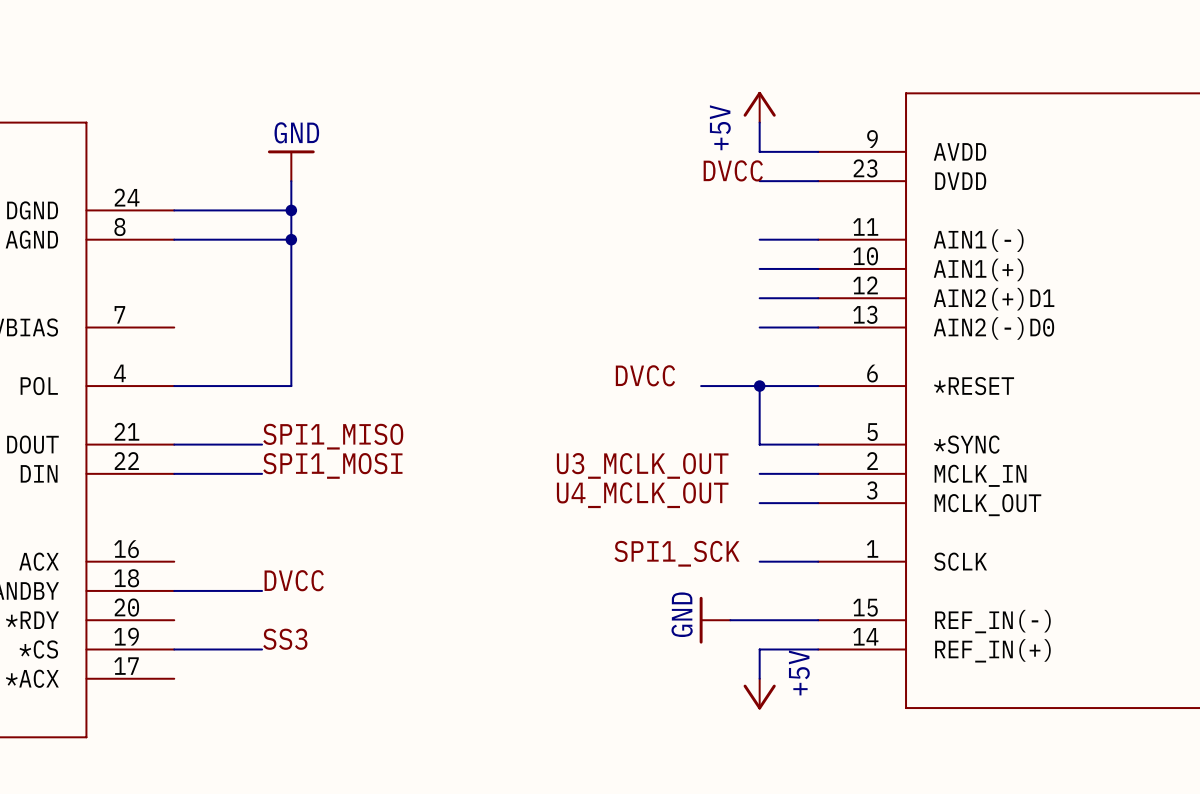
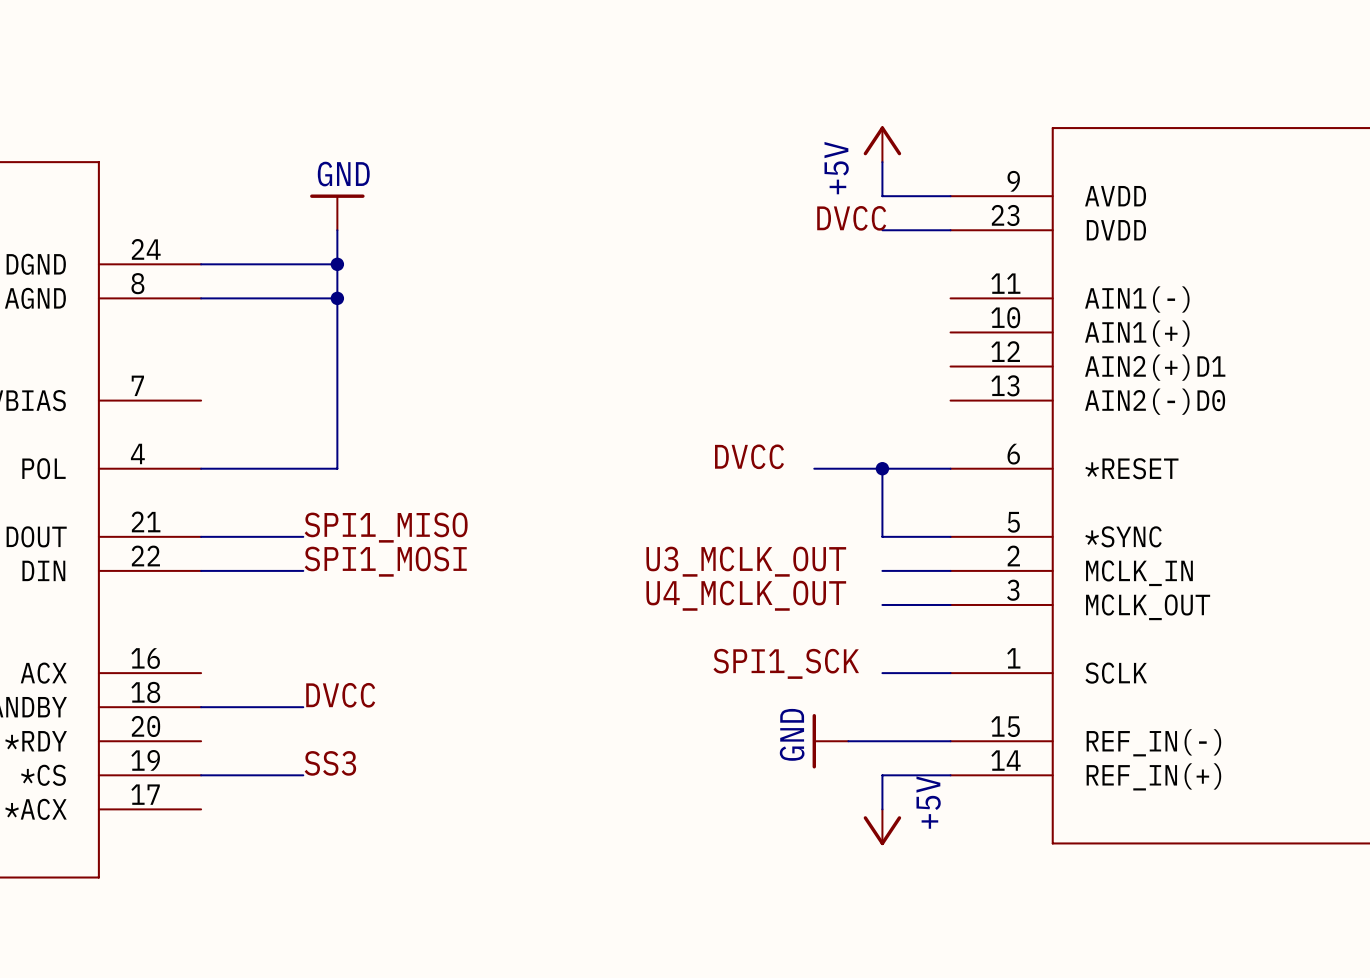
wire: (759, 239) (818, 239) -> none
wire: (759, 268) (818, 268) -> none
wire: (759, 298) (818, 298) -> none
wire: (759, 327) (818, 327) -> none

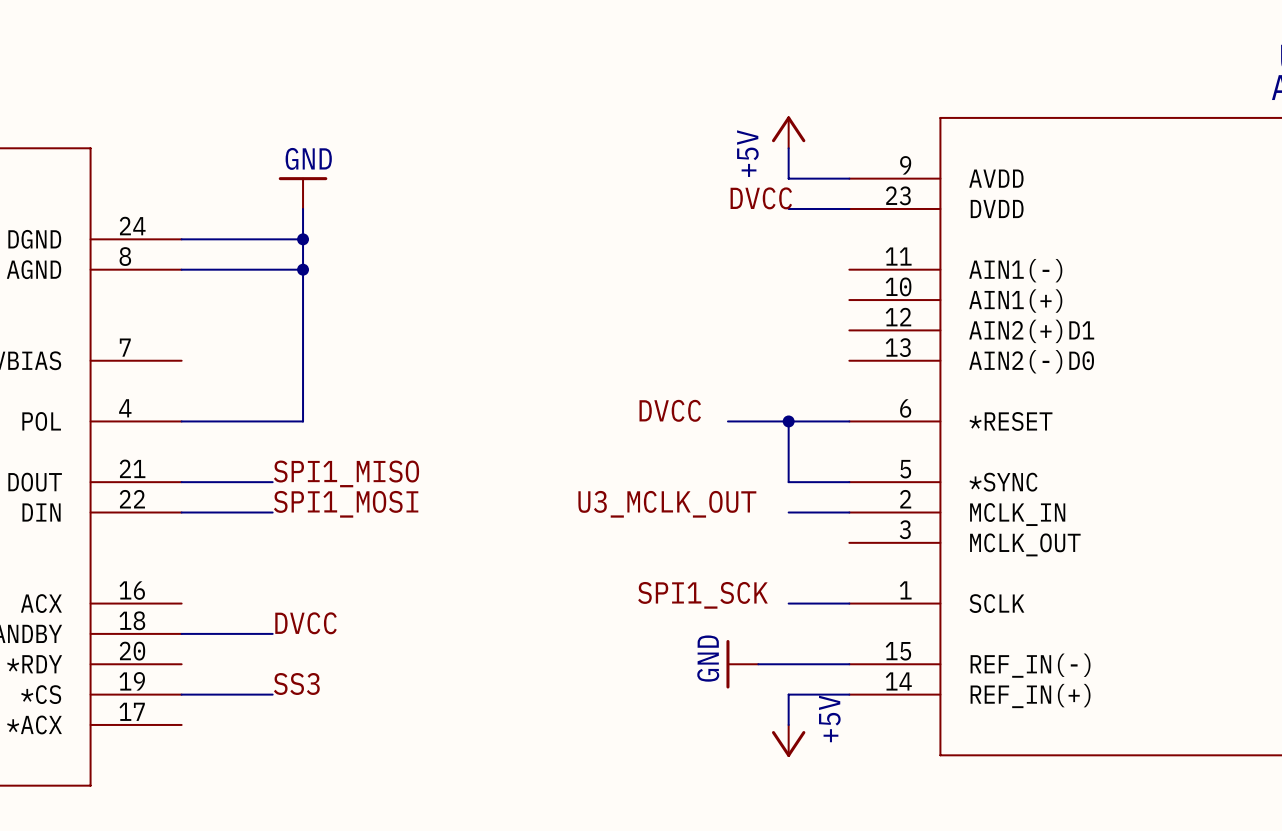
label: U4_MCLK_OUT (746, 595) -> none
wire: (882, 604) (950, 604) -> none

